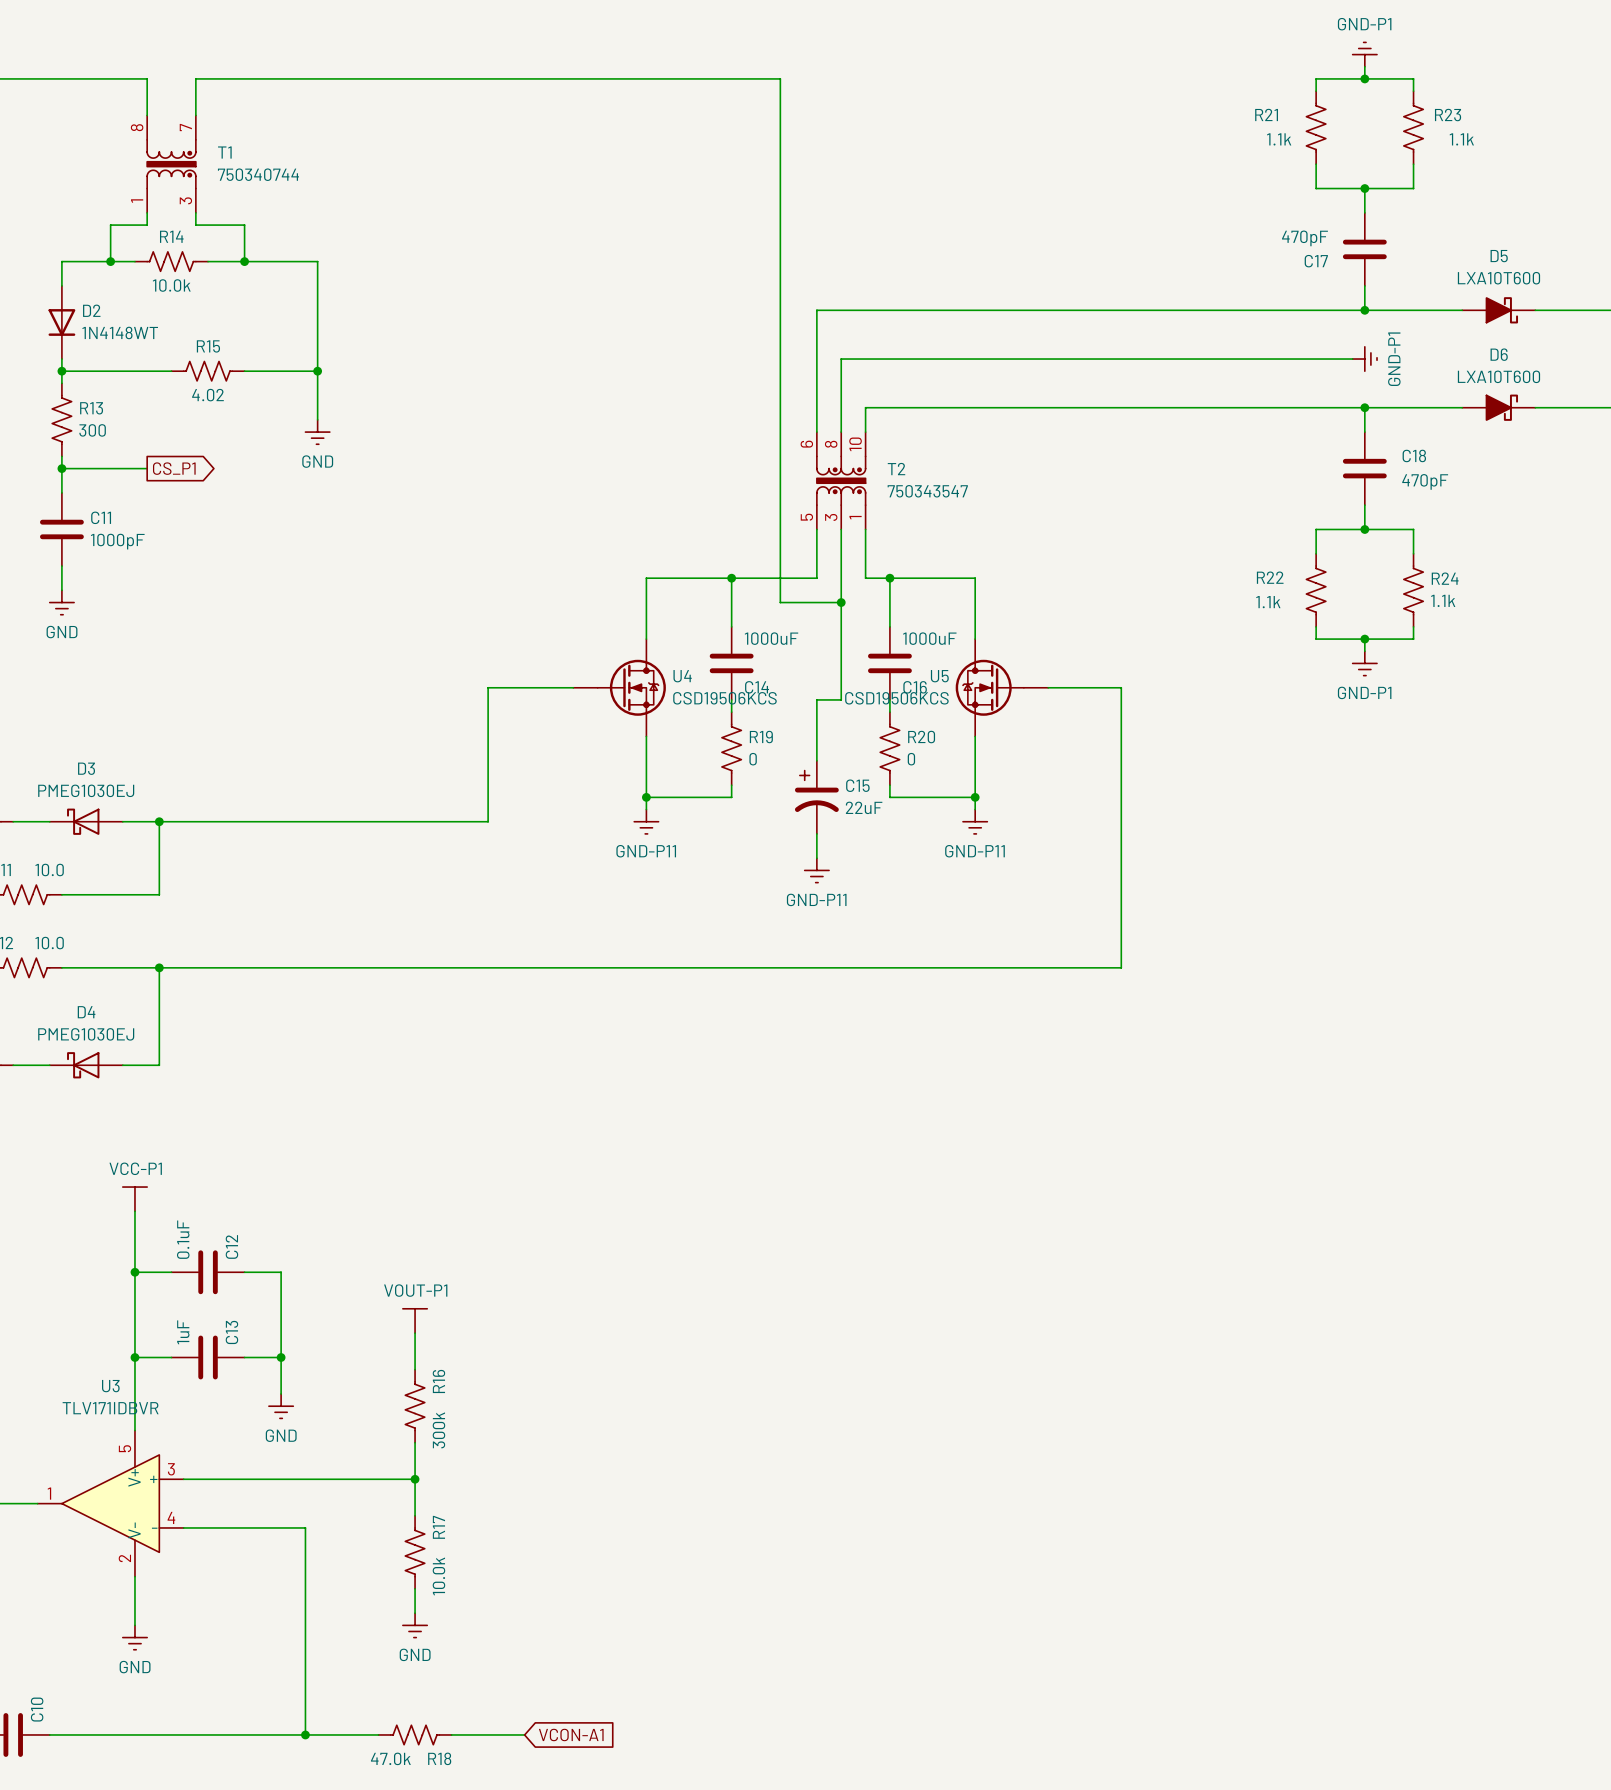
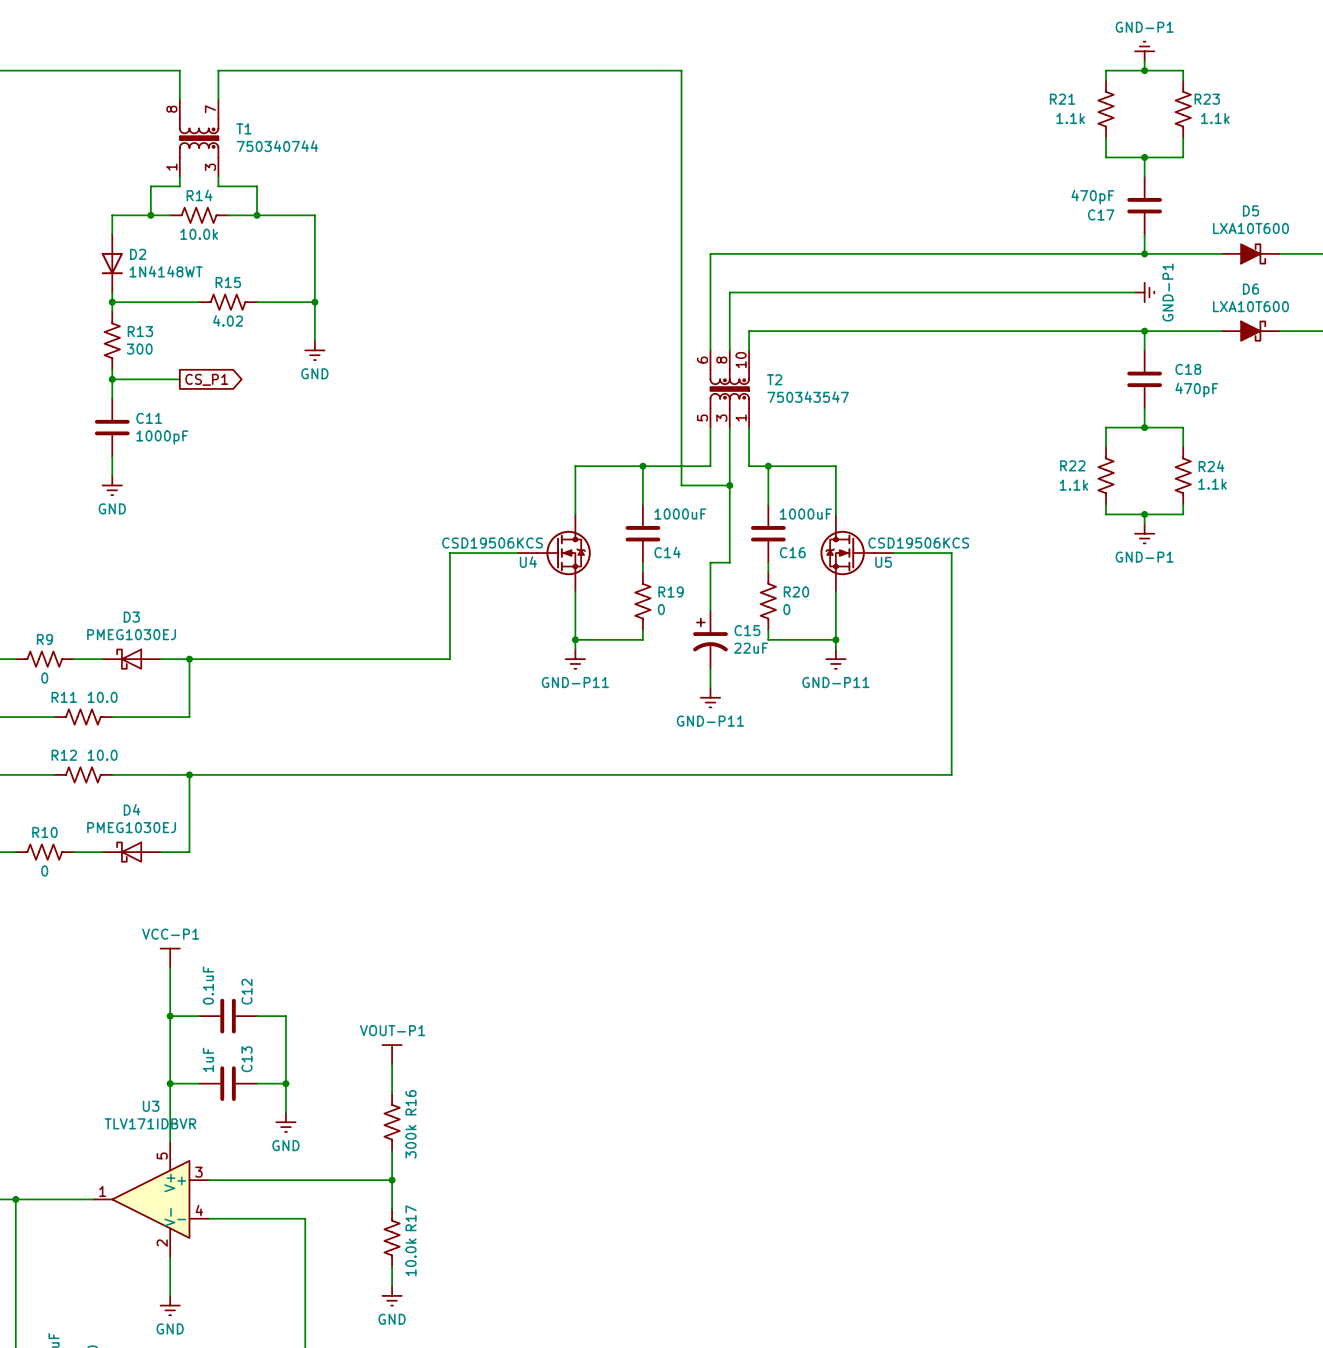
U4 name position: U4 (682, 676) -> U4 (528, 562)
U5 name position: U5 (939, 676) -> U5 (883, 562)
U4 value position: CSD19506KCS (724, 698) -> CSD19506KCS (492, 543)
U5 value position: CSD19506KCS (896, 698) -> CSD19506KCS (918, 543)

